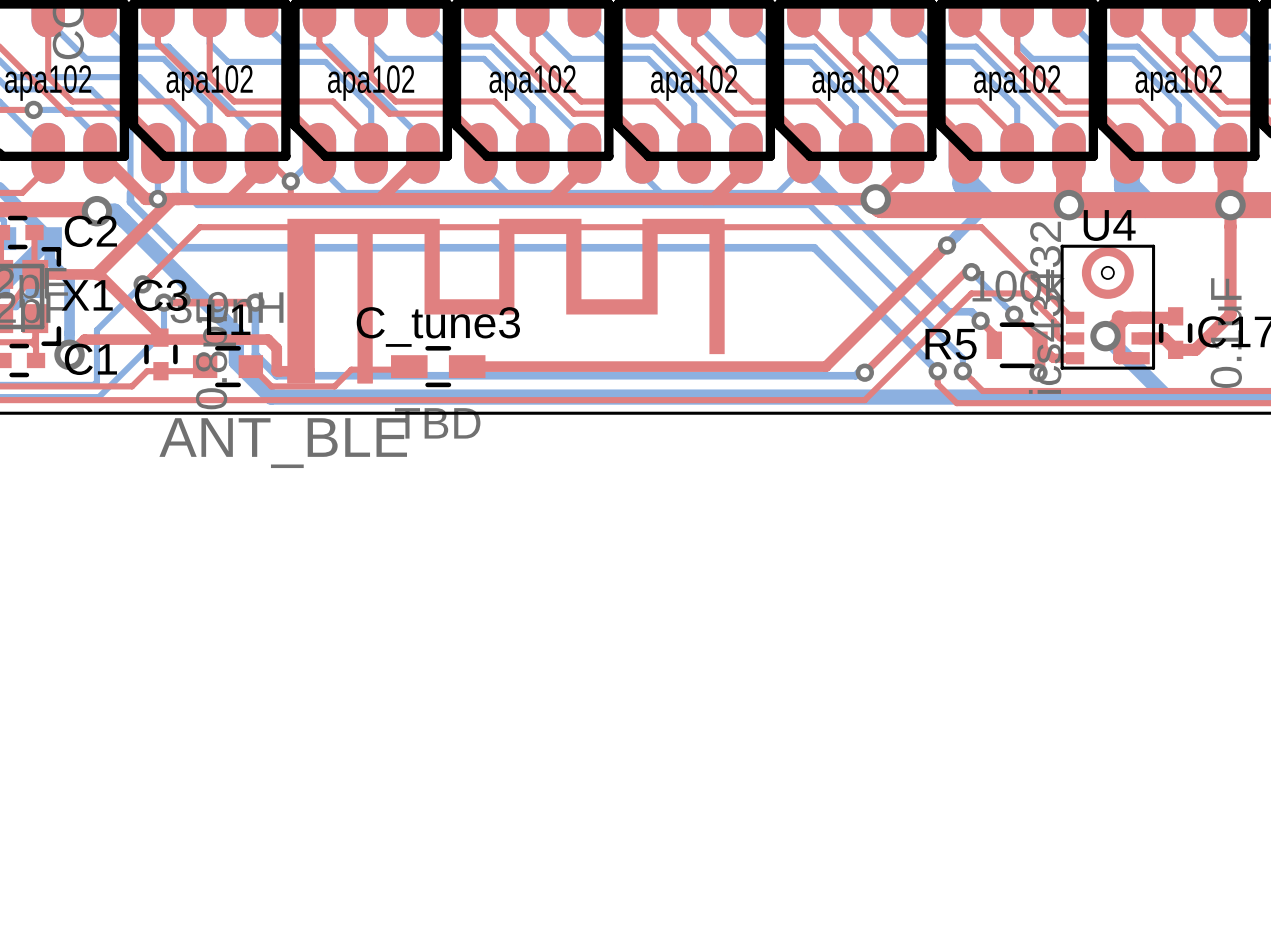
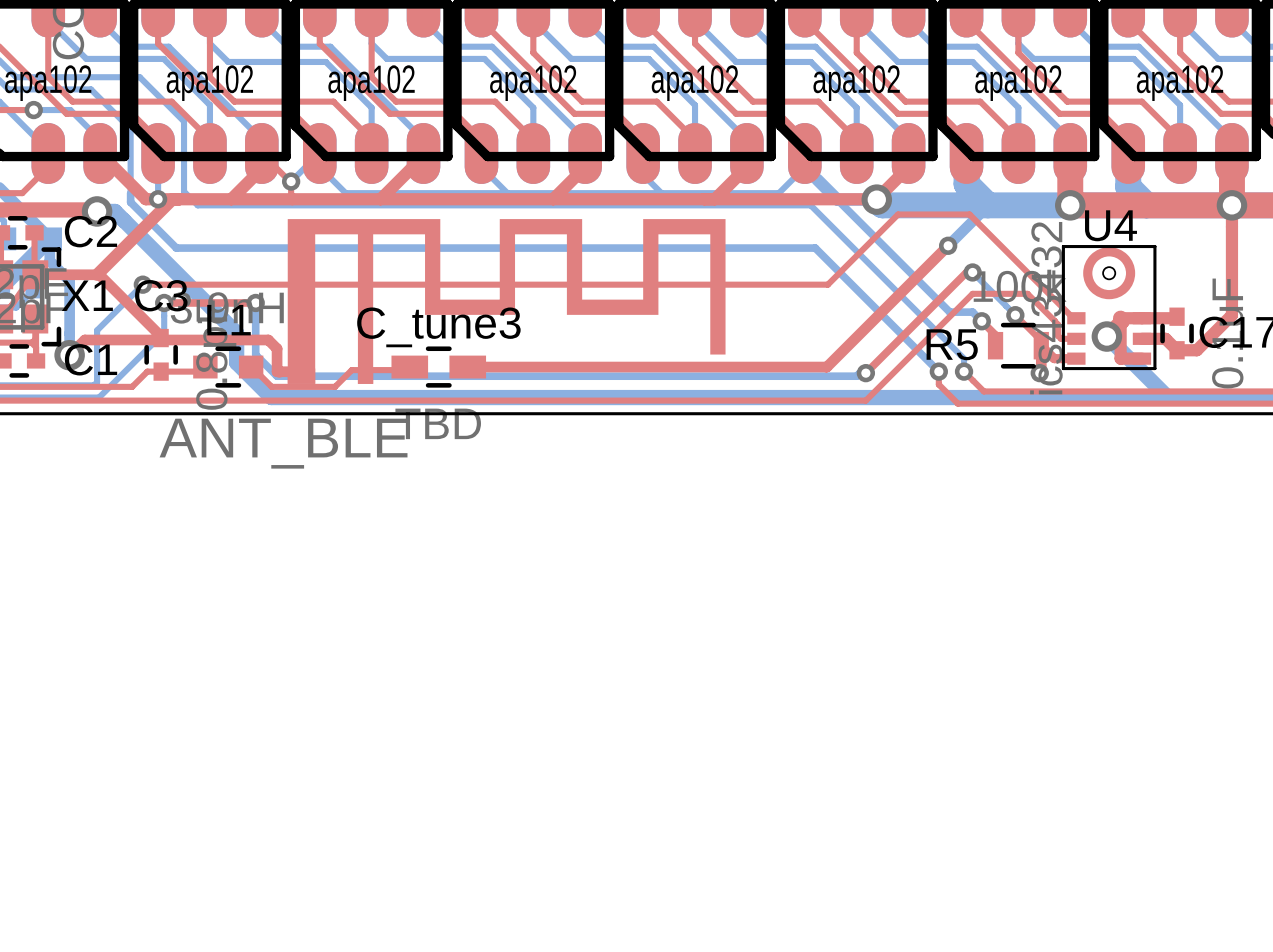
top track: (875, 199) (881, 205) (1069, 205) -> none
top track: (981, 227) (199, 227) (142, 284) -> (982, 227) (969, 214) (898, 214) (827, 284) (142, 284)

